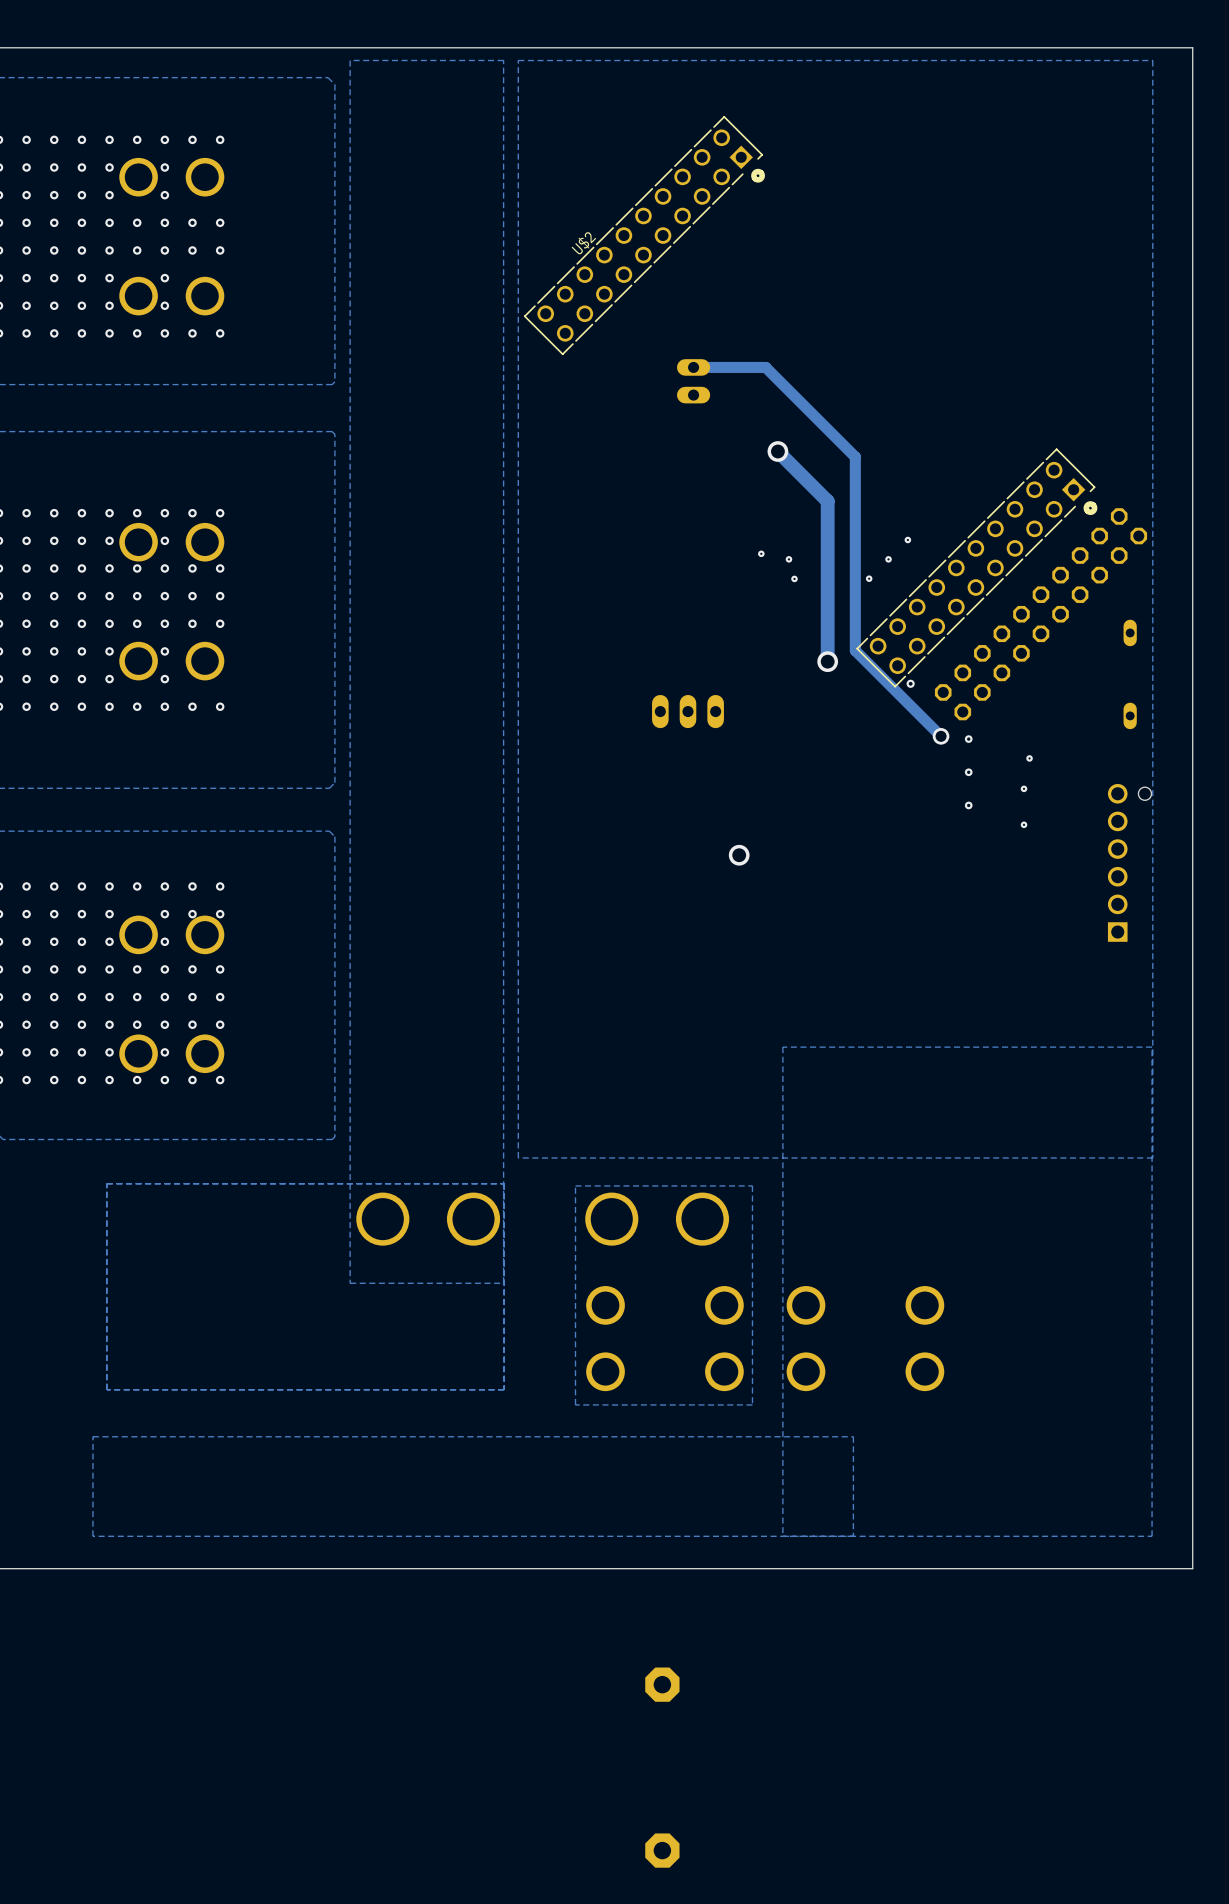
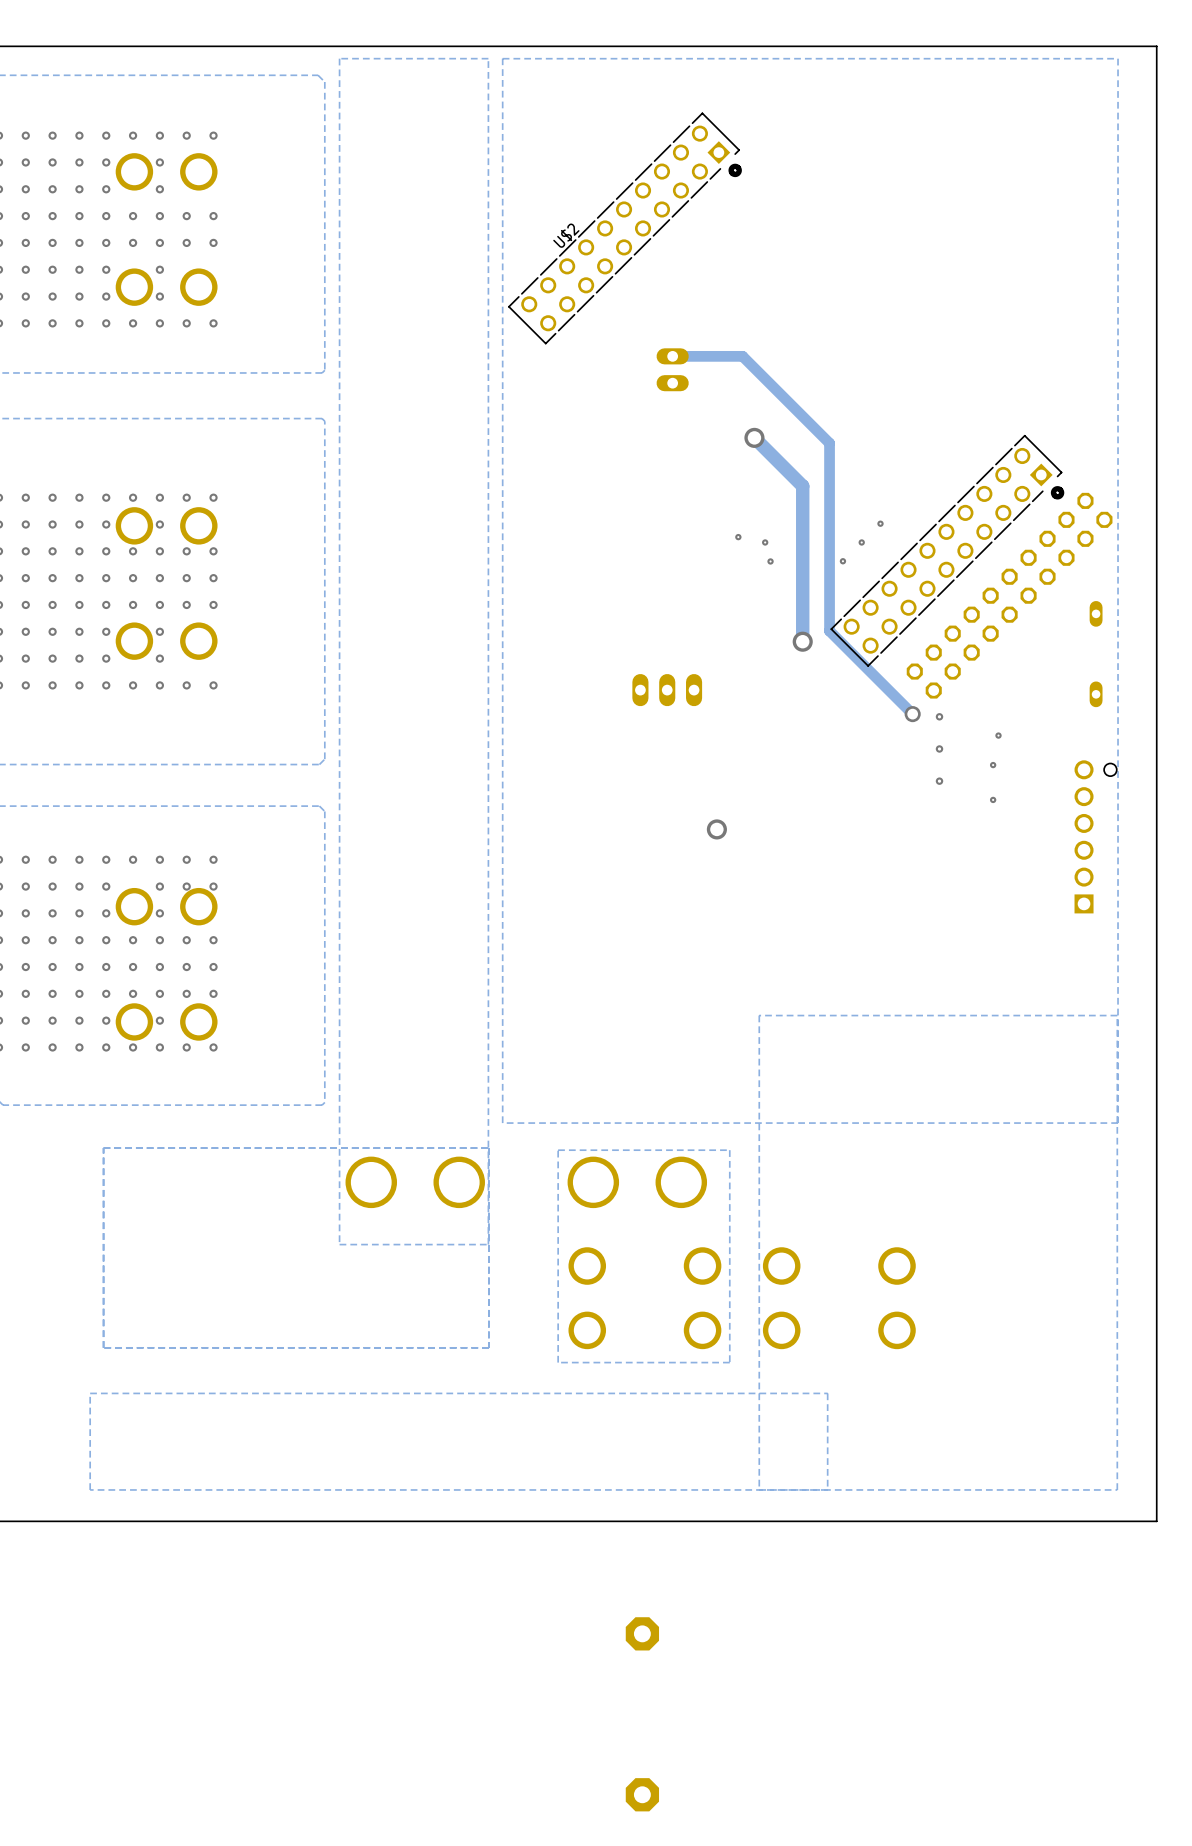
via: (910, 683) -> none

